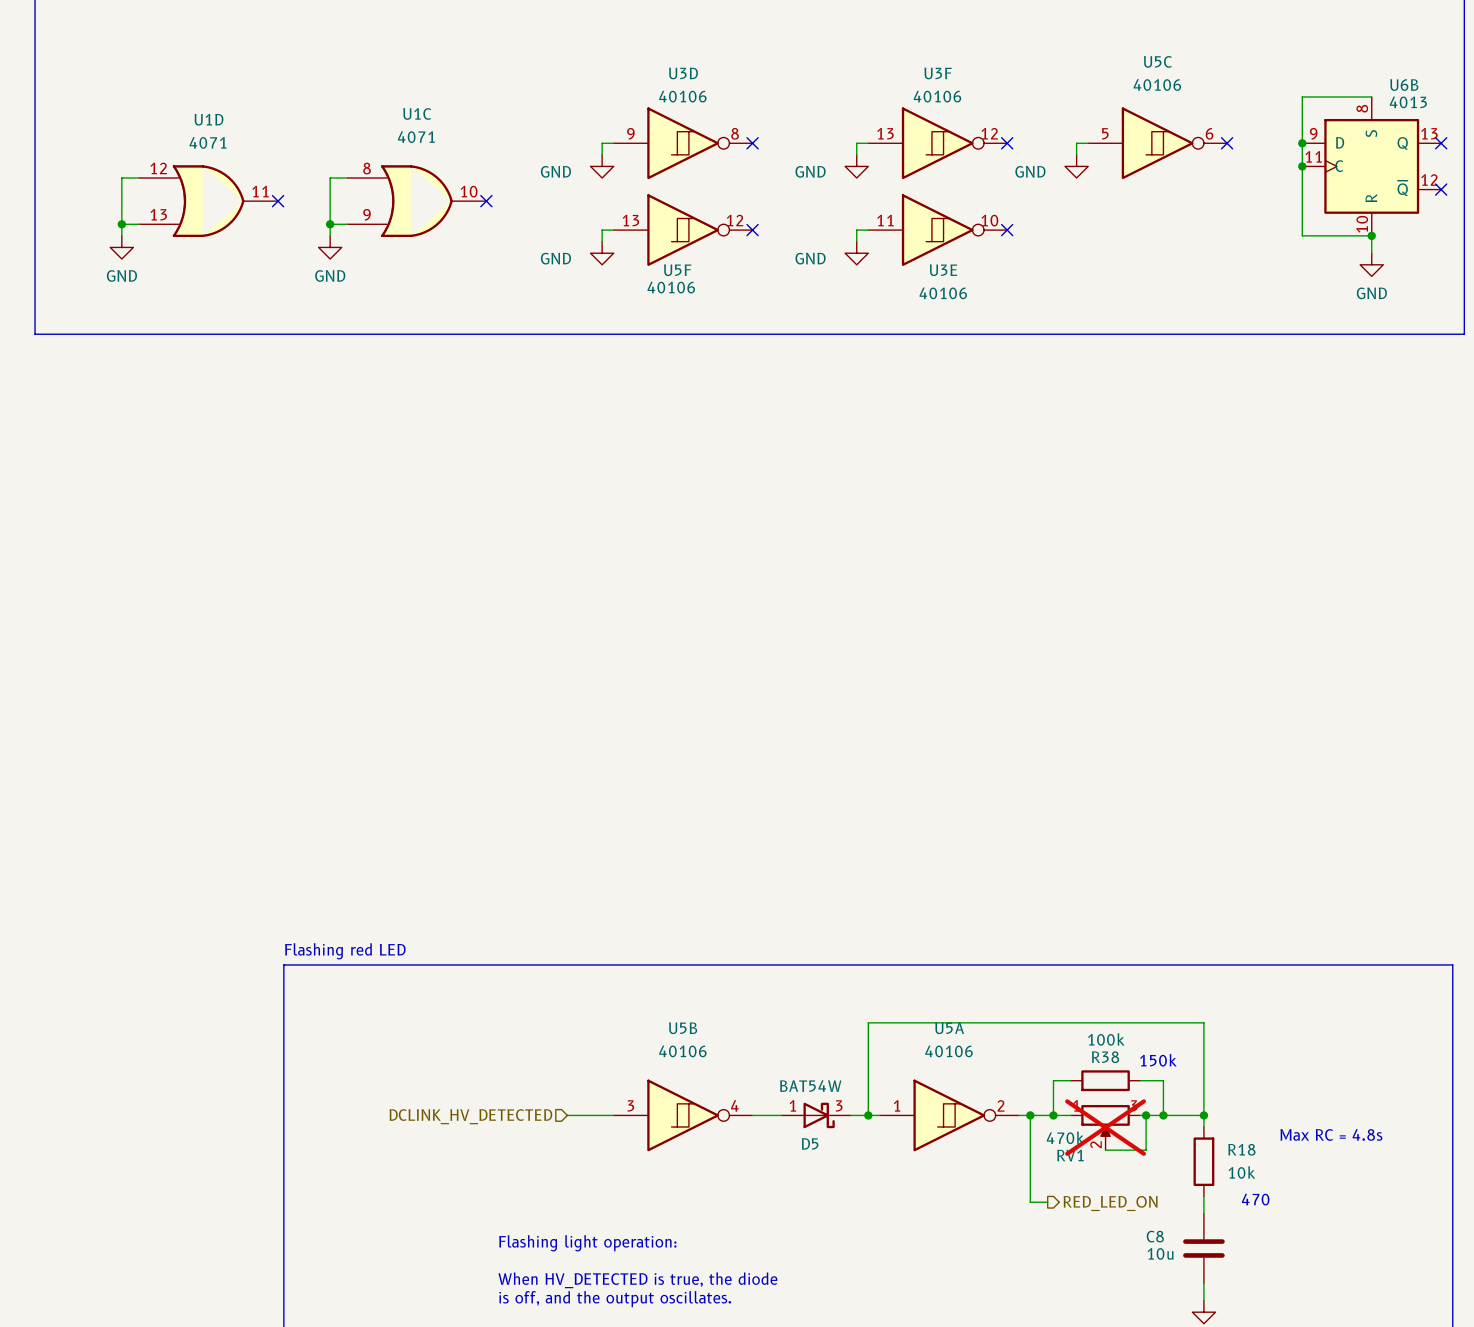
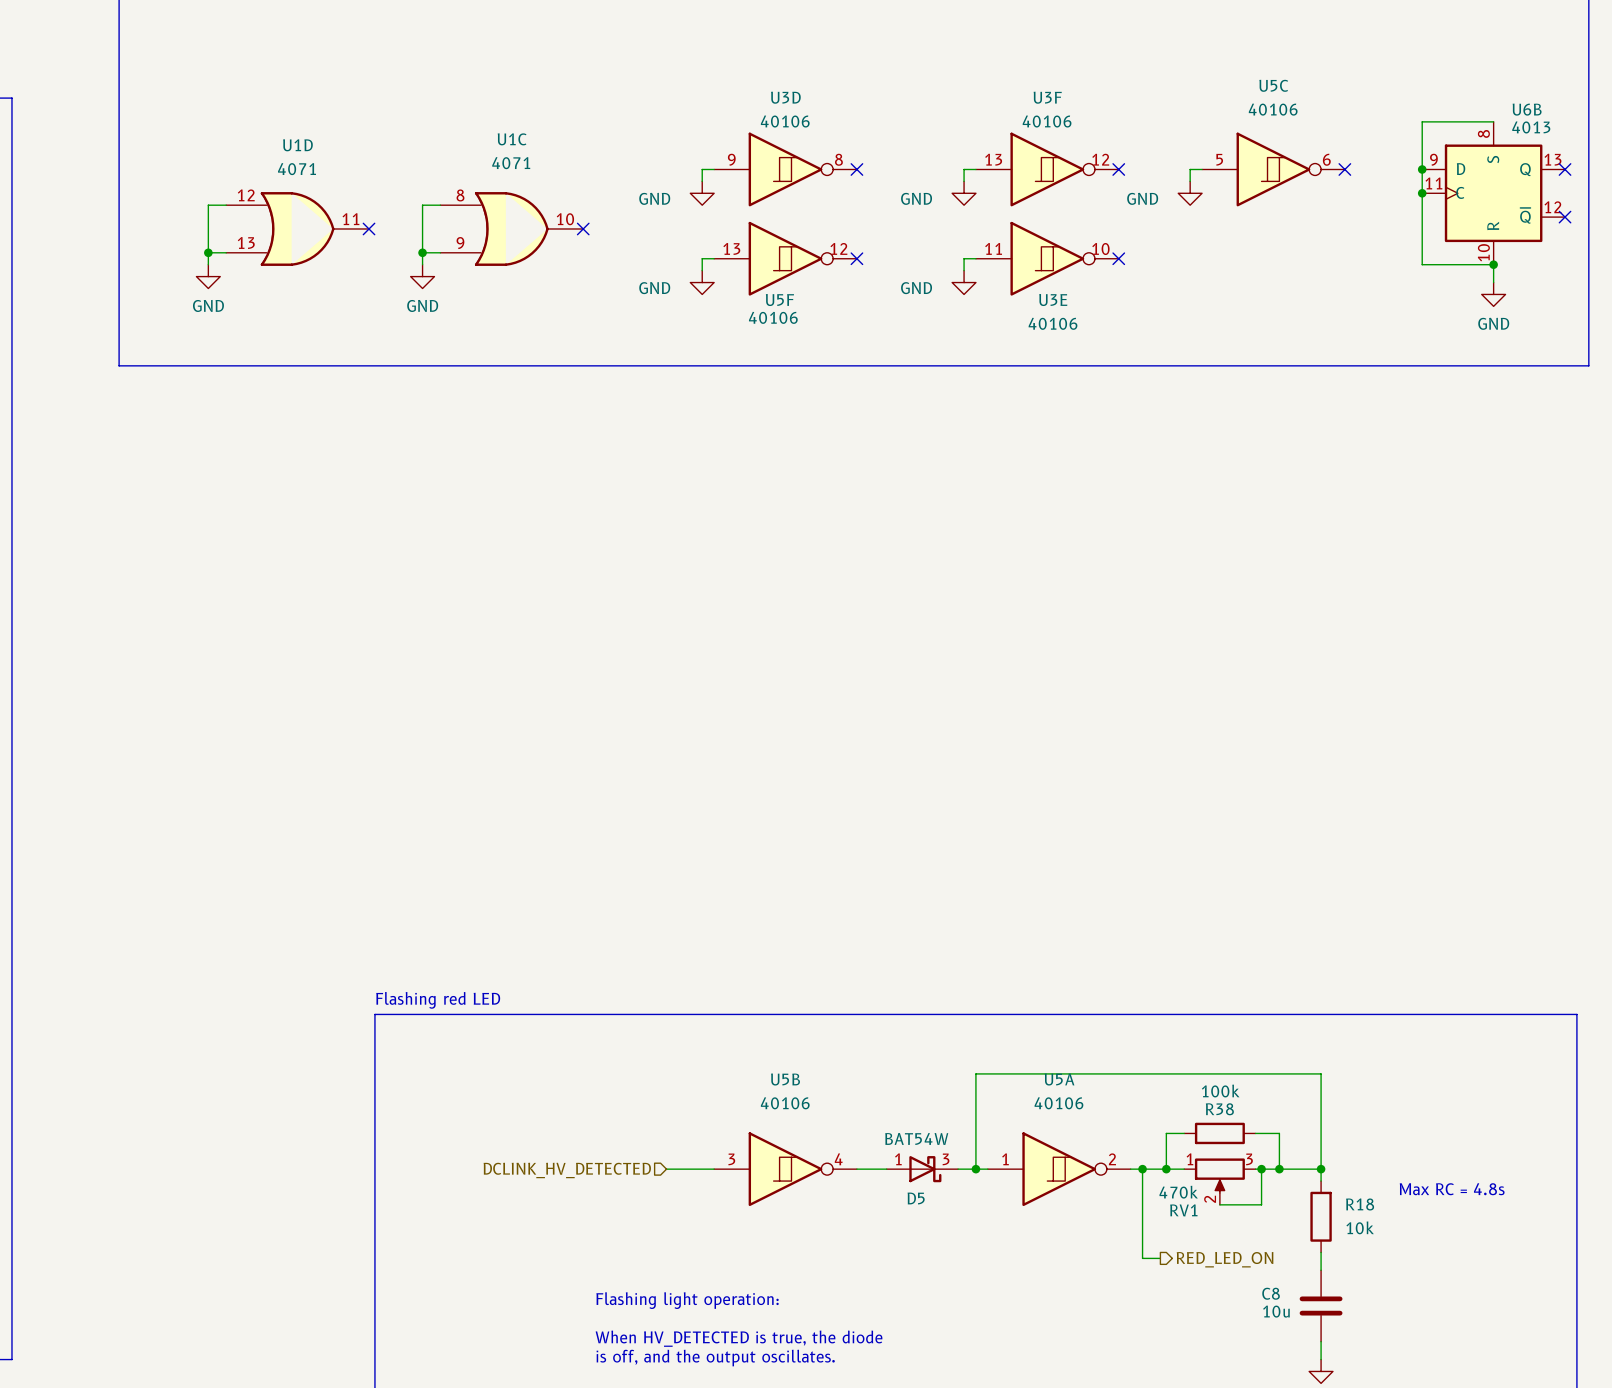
text: 150k (1158, 1060) -> none
RV1 do-not-place cross: (1105, 1127) -> none
text: 470 (1255, 1199) -> none

